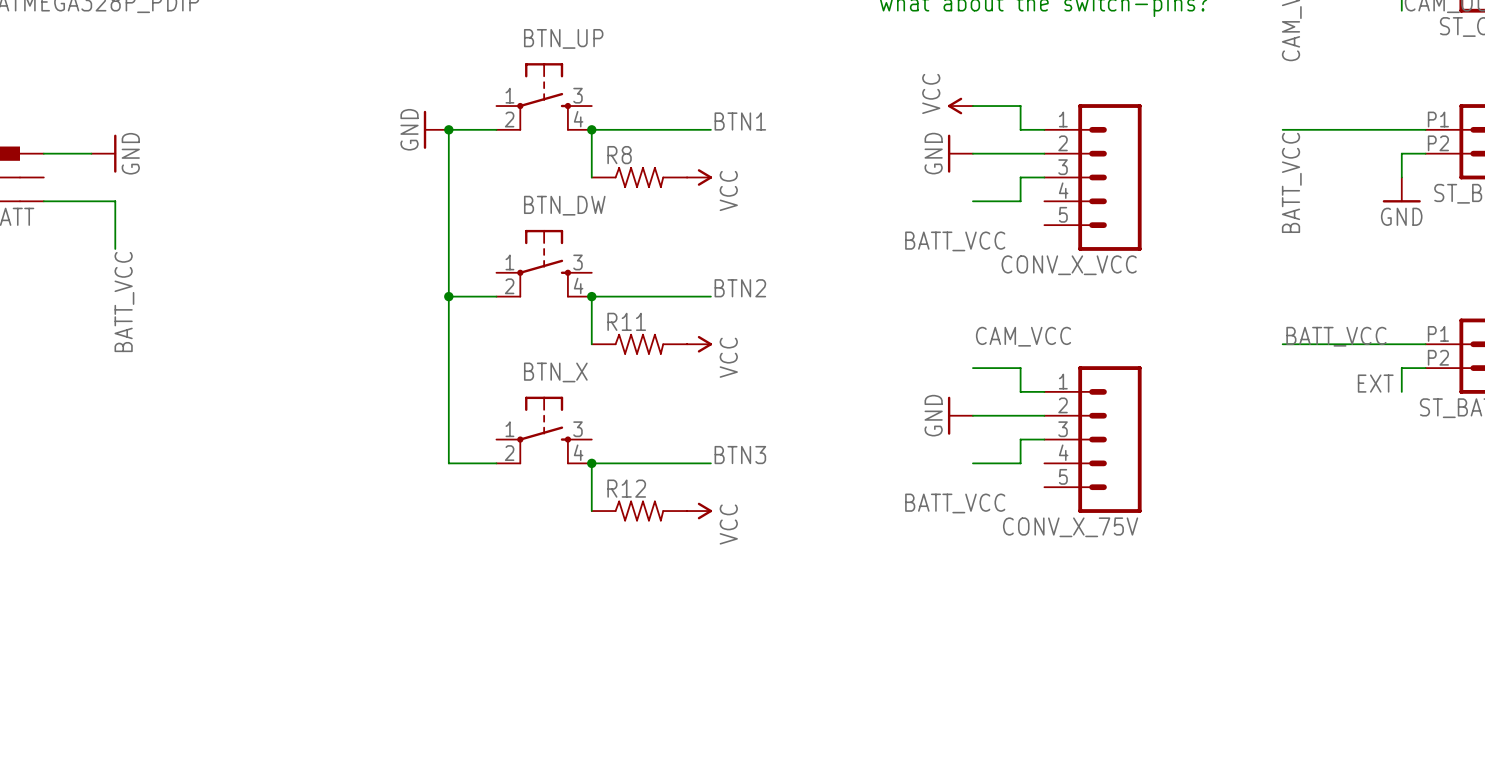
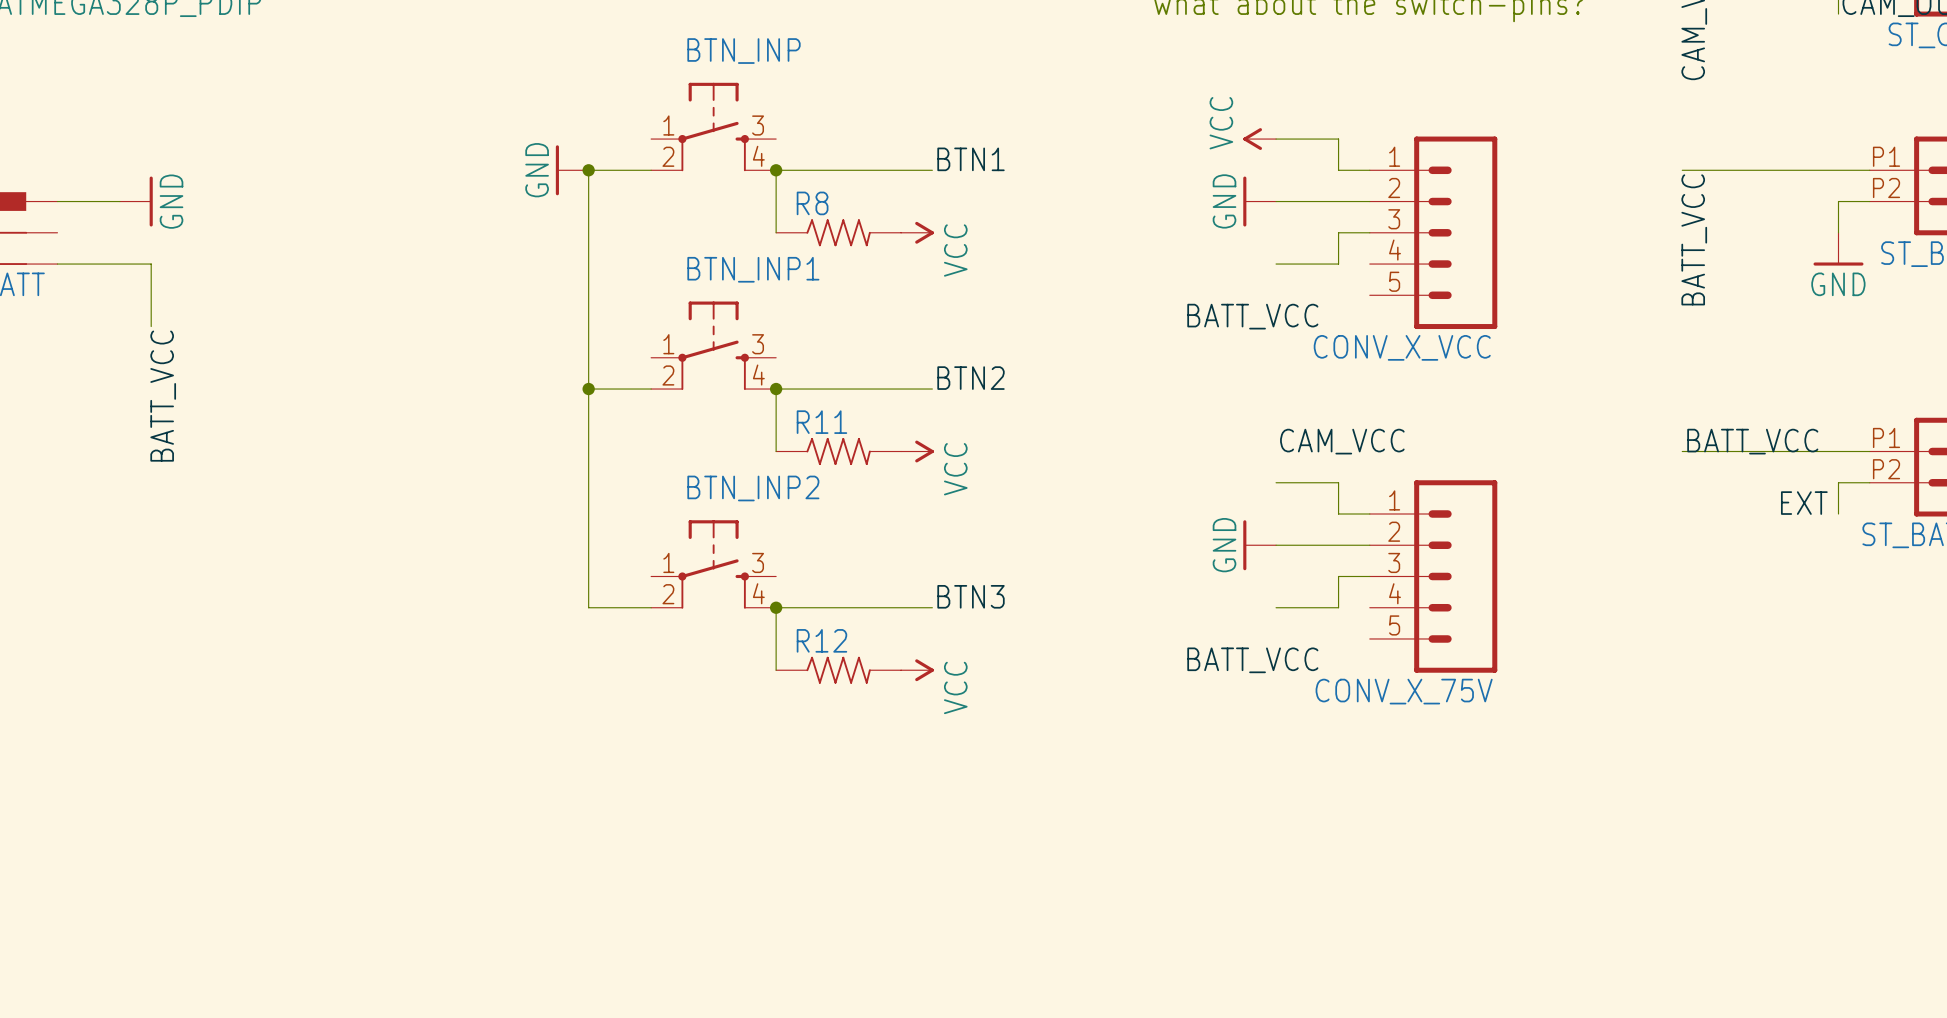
BTN_UP name: BTN_UP (563, 38) -> BTN_INP (744, 51)
BTN_DW name: BTN_DW (564, 205) -> BTN_INP1 (753, 269)
BTN_X name: BTN_X (555, 372) -> BTN_INP2 (753, 488)

